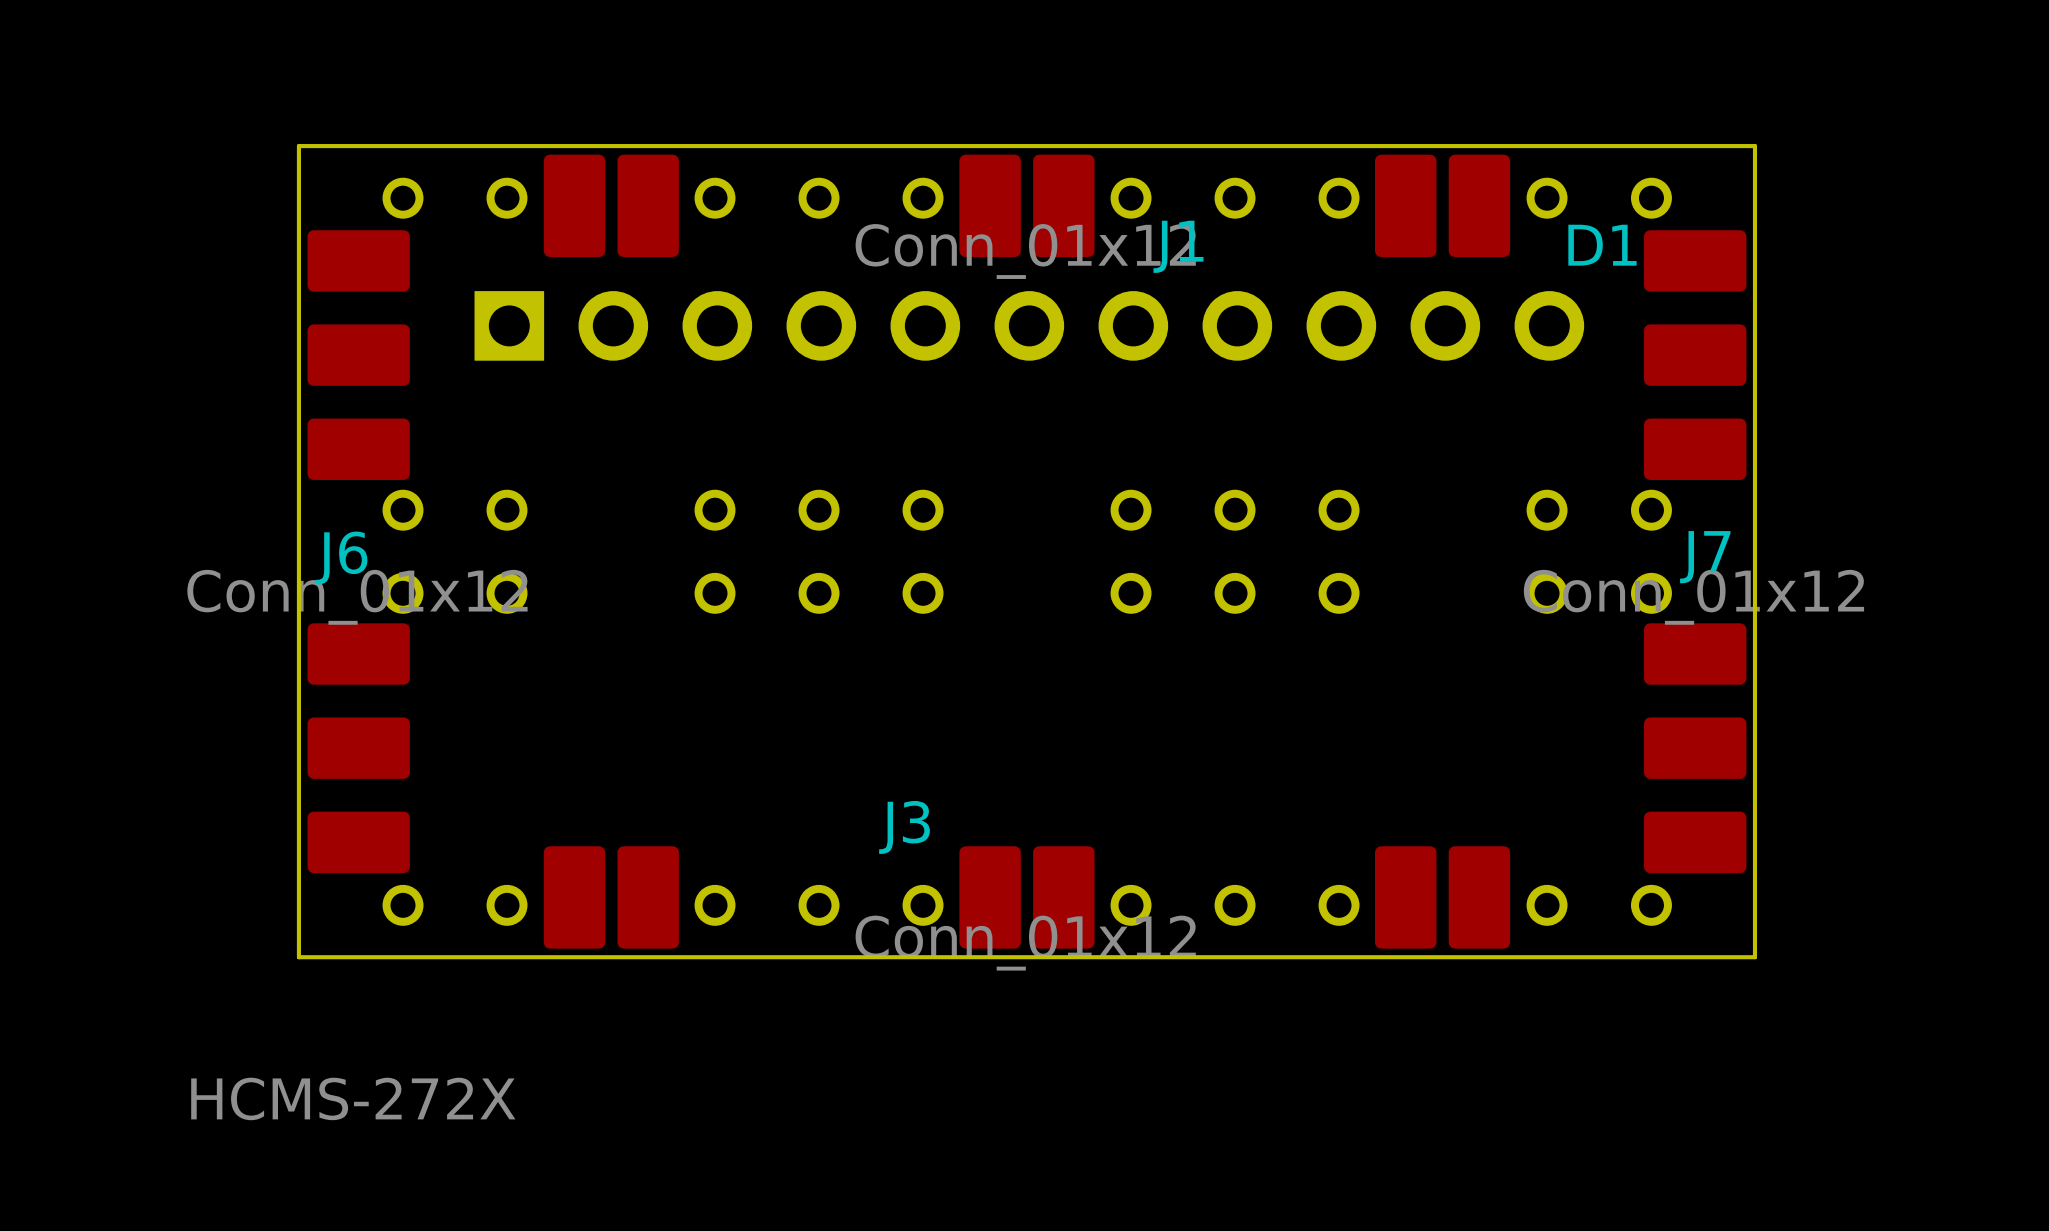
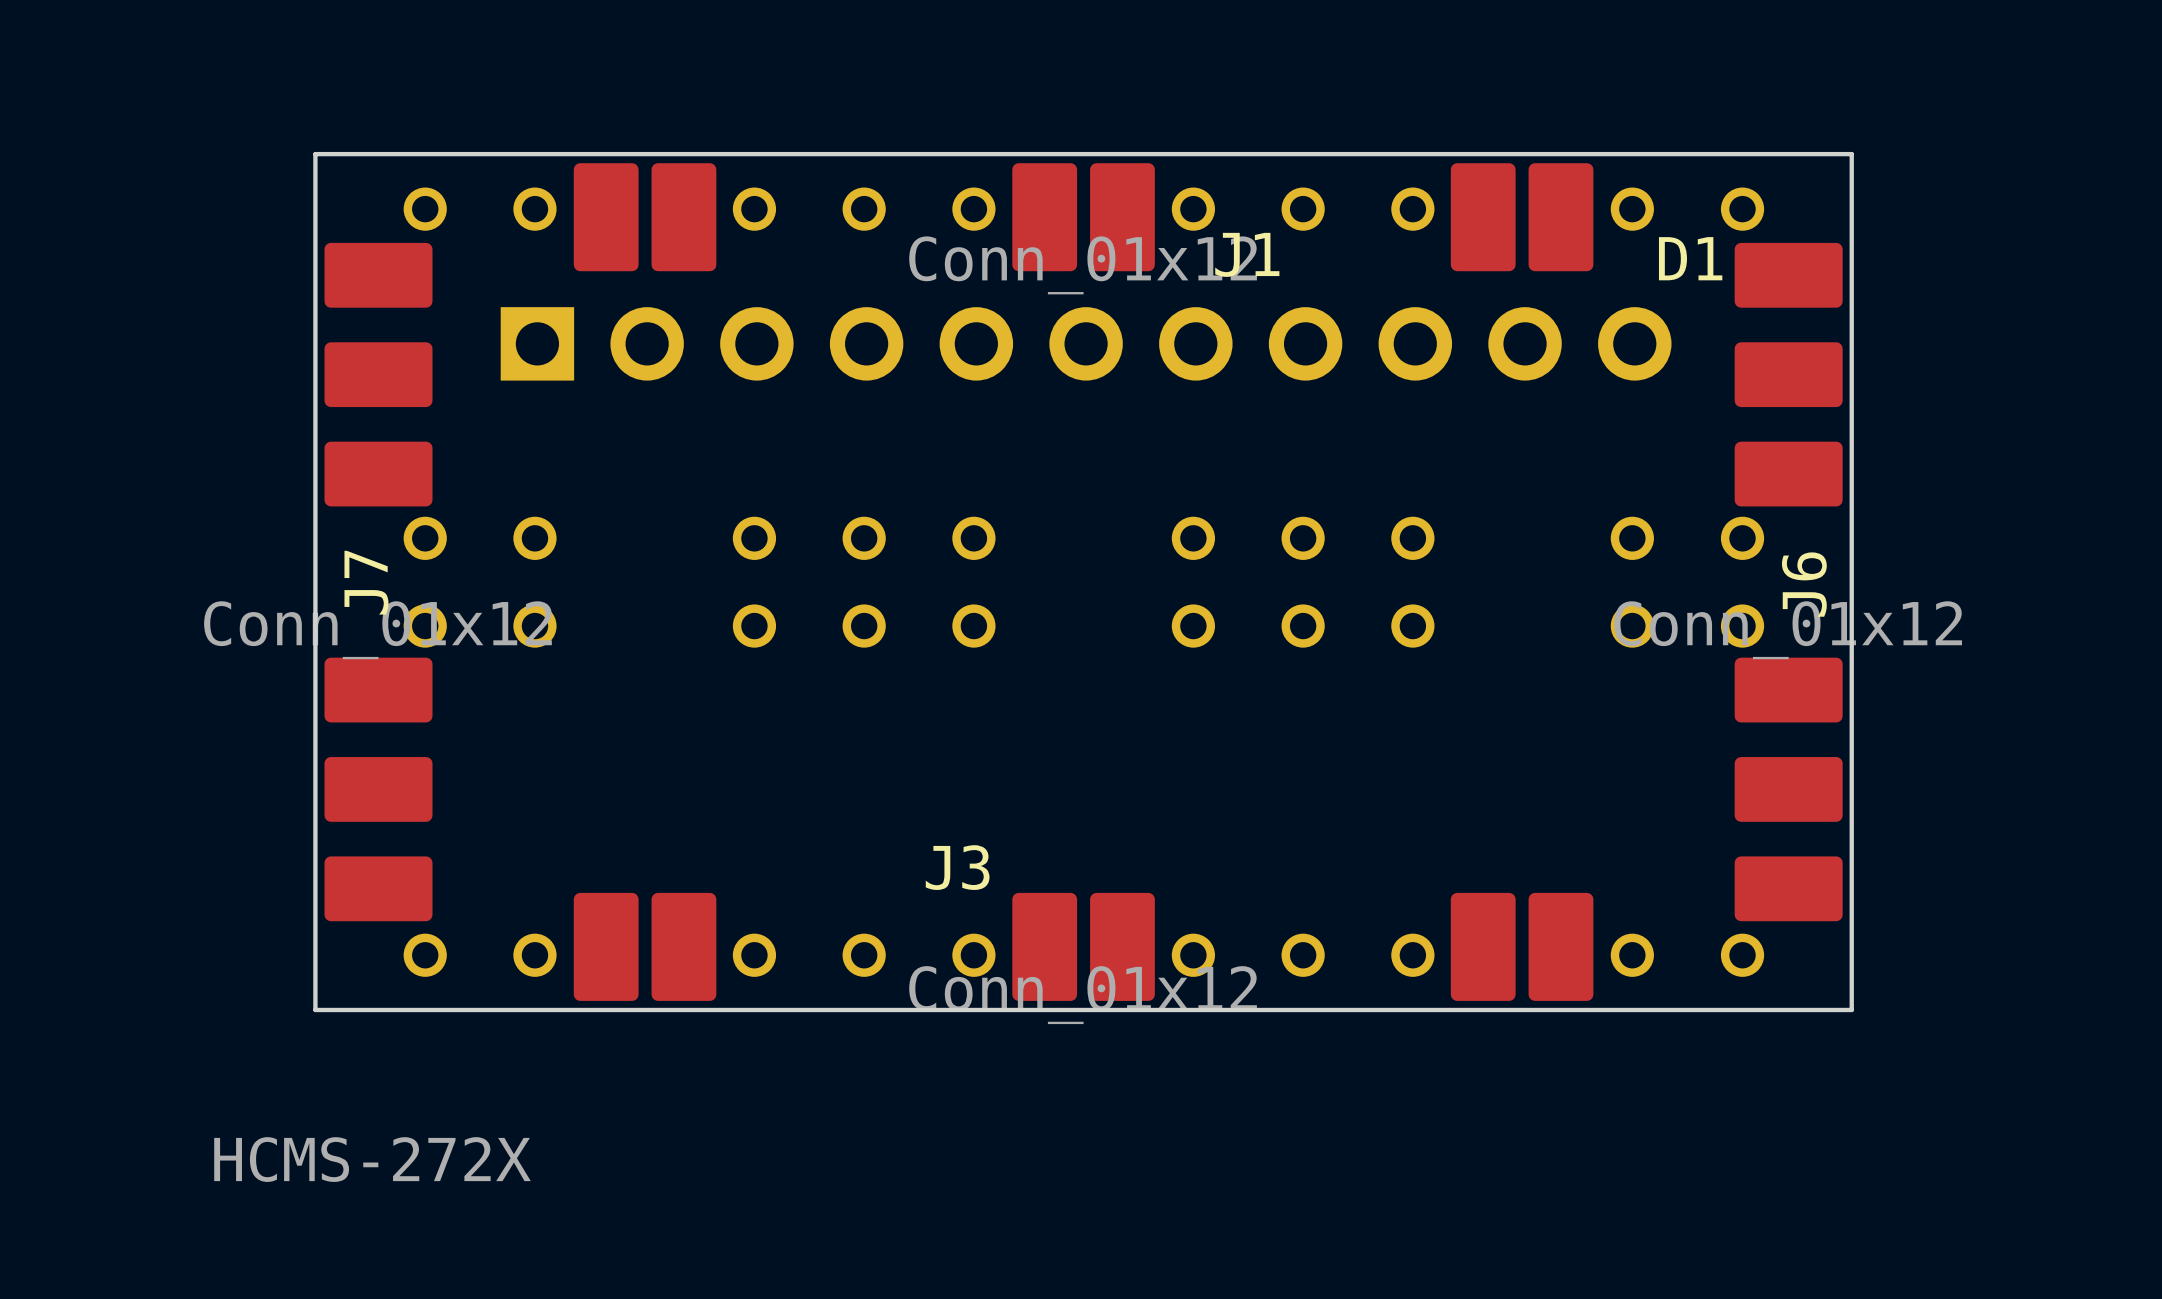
J7 name: J7 (1705, 557) -> J6 (1804, 584)
J6 name: J6 (341, 558) -> J7 (366, 582)

